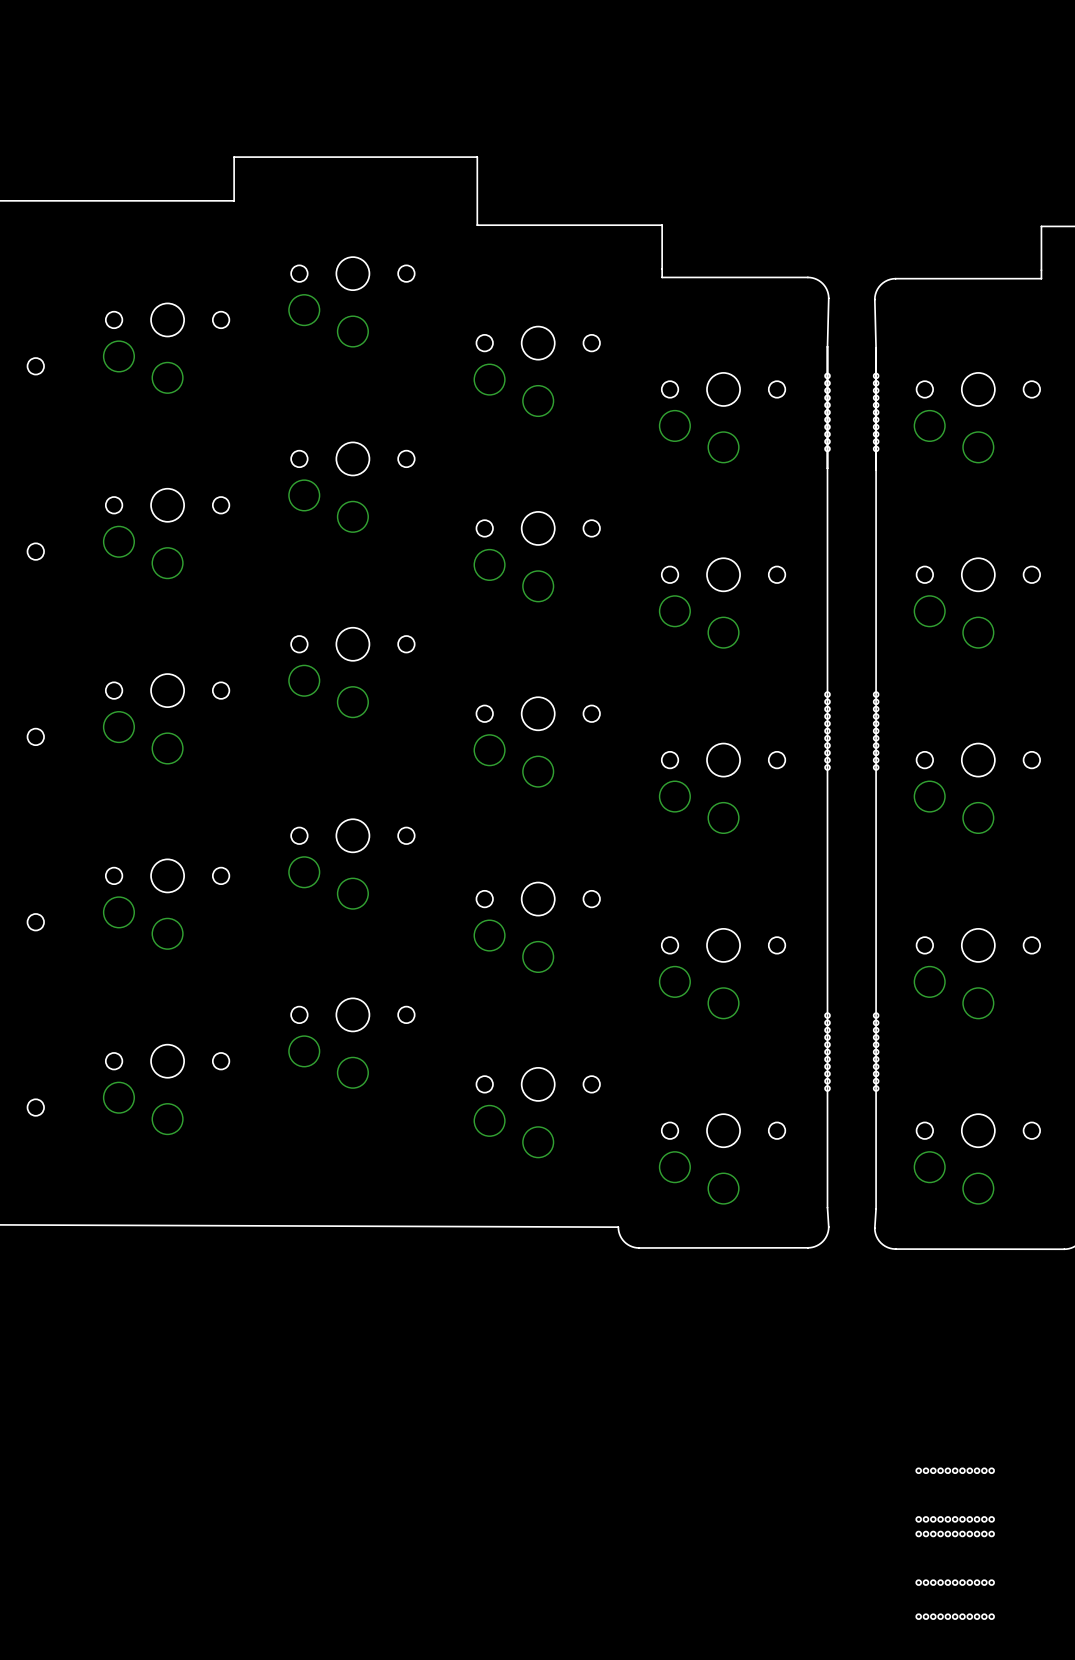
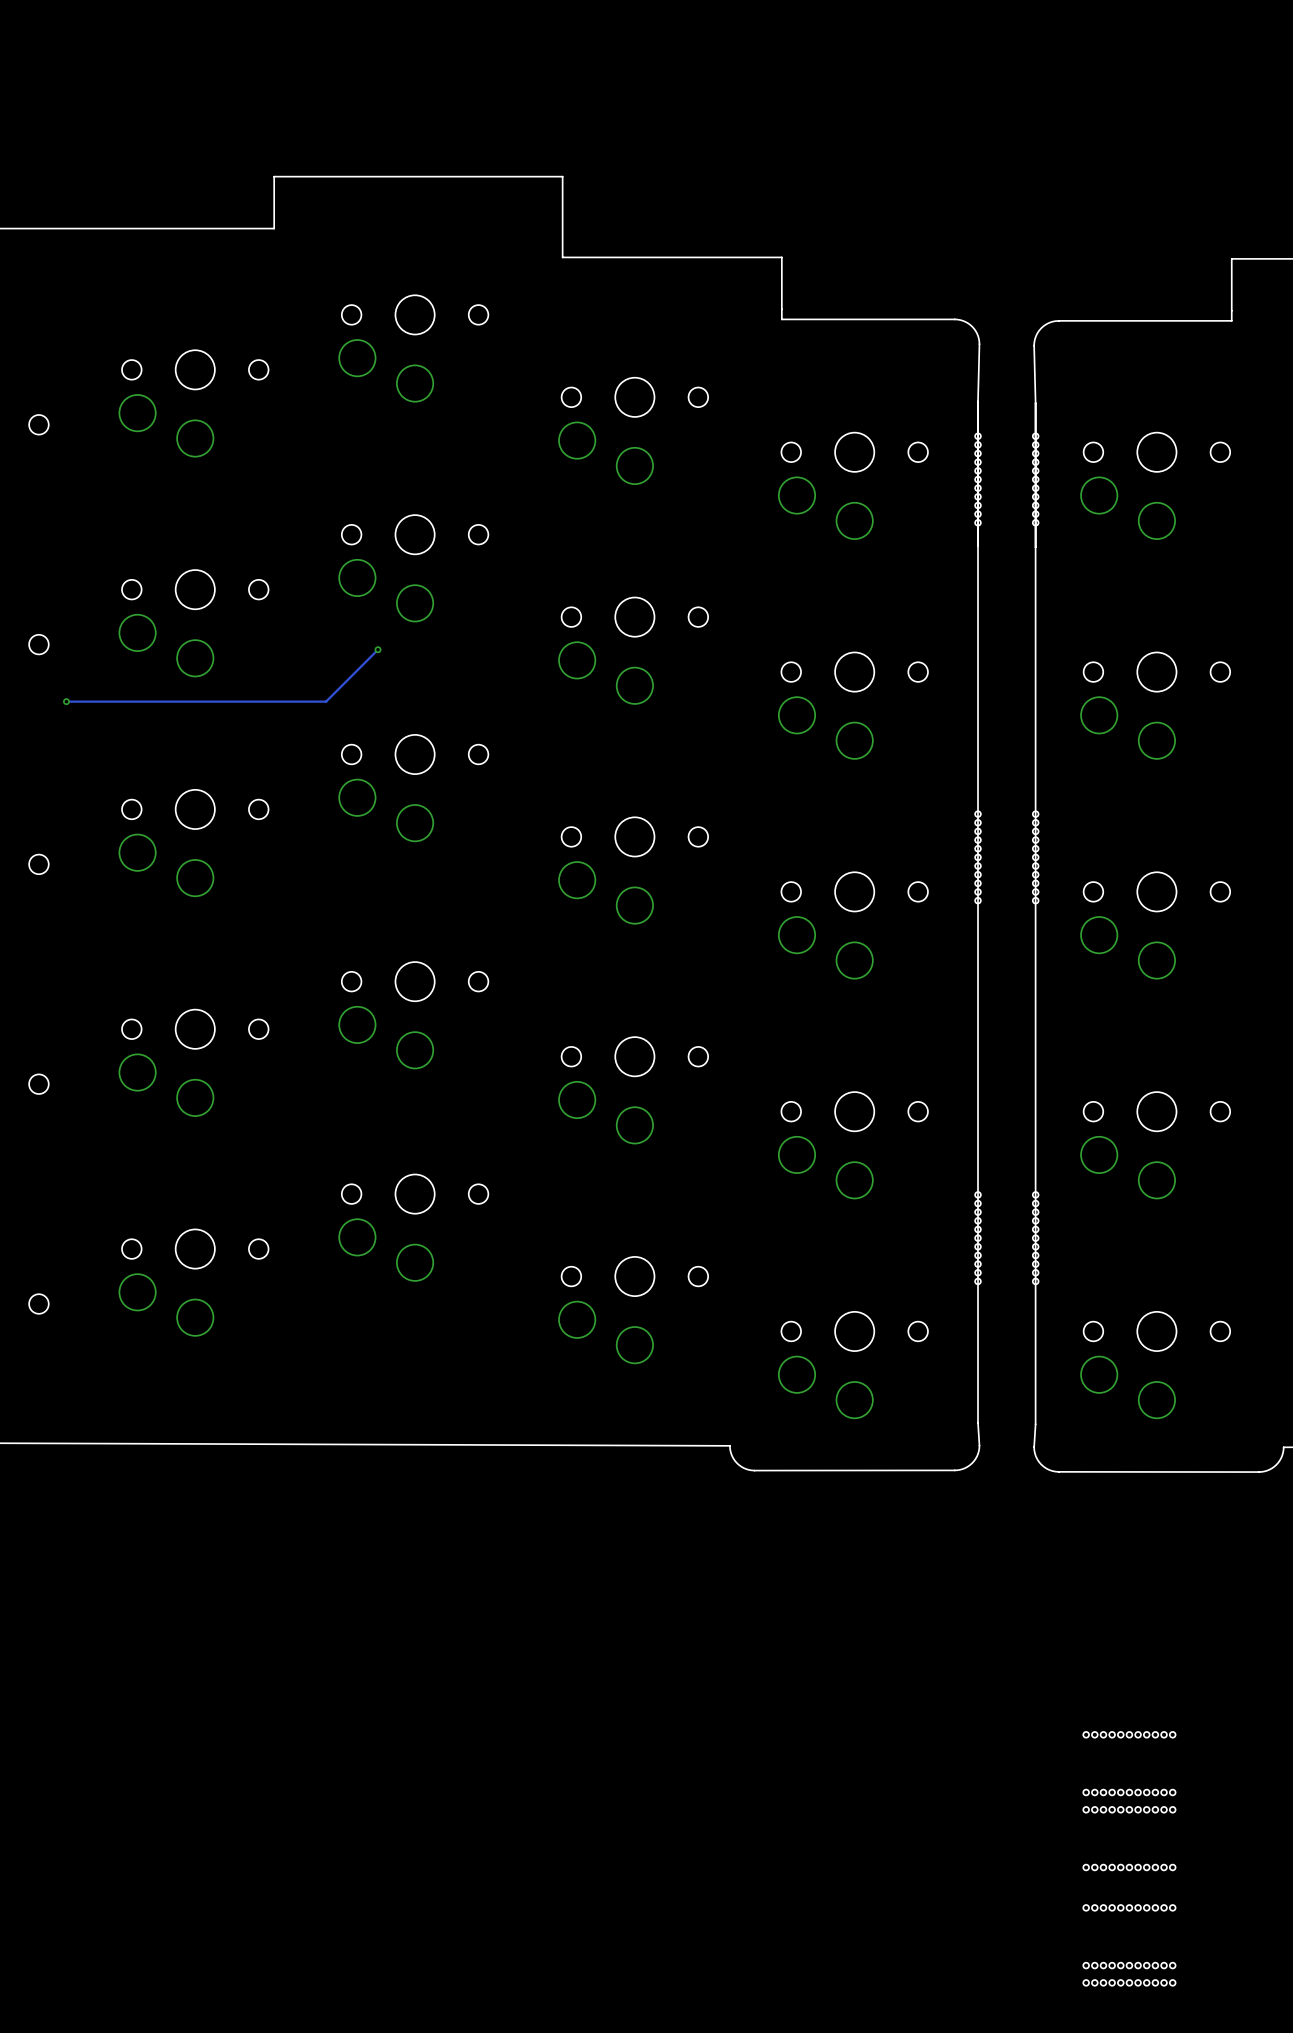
track: none -> (378, 649) (326, 701) (66, 701)
via: none -> (378, 649)
via: none -> (66, 701)

